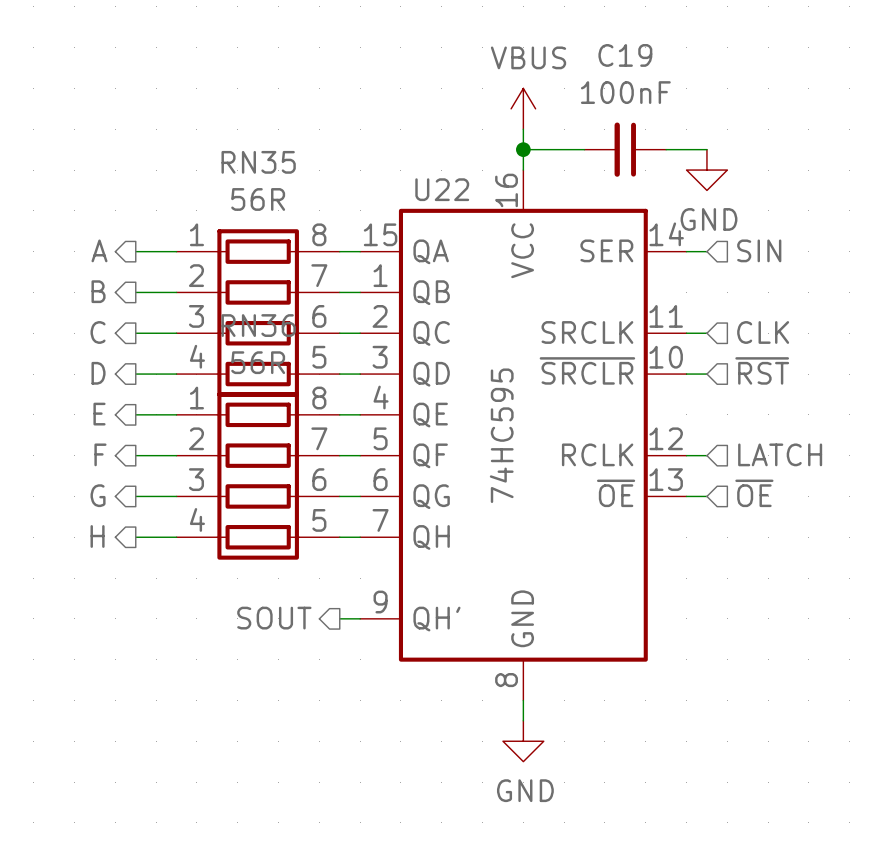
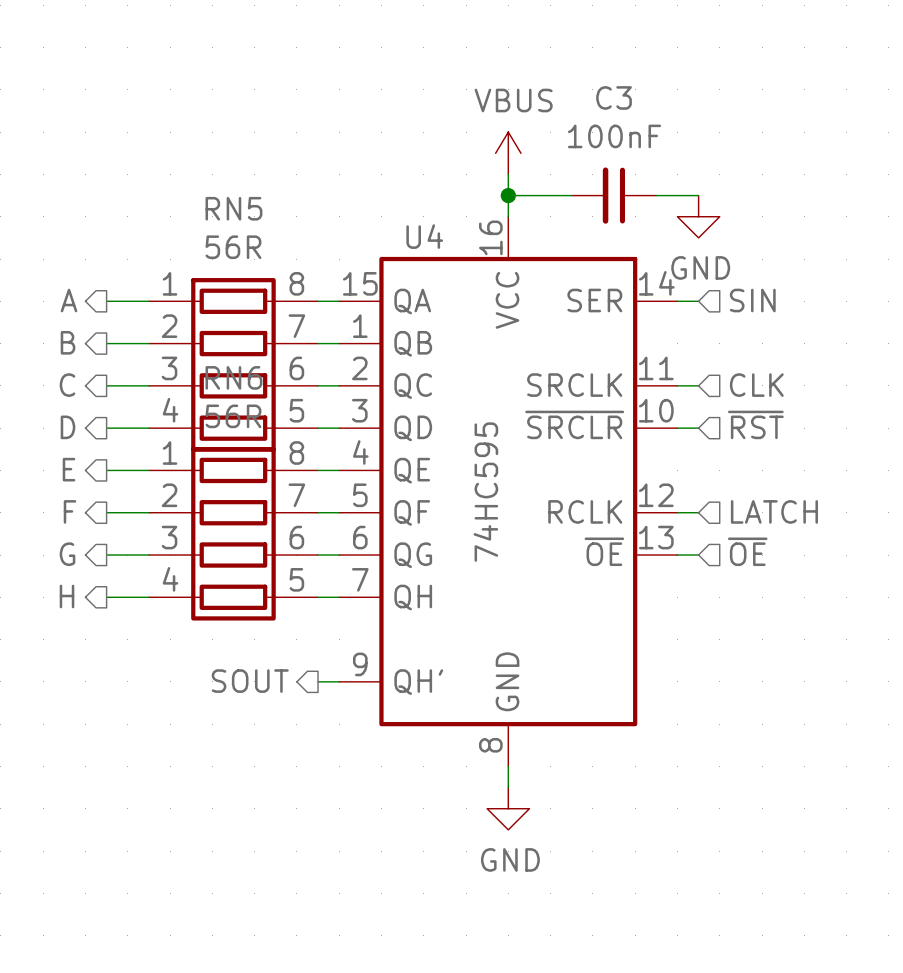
C19 name: C19 (625, 55) -> C3 (614, 97)
RN35 name: RN35 (258, 162) -> RN5 (233, 208)
U22 name: U22 (442, 189) -> U4 (424, 236)
RN36 name: RN36 (258, 325) -> RN6 (233, 377)

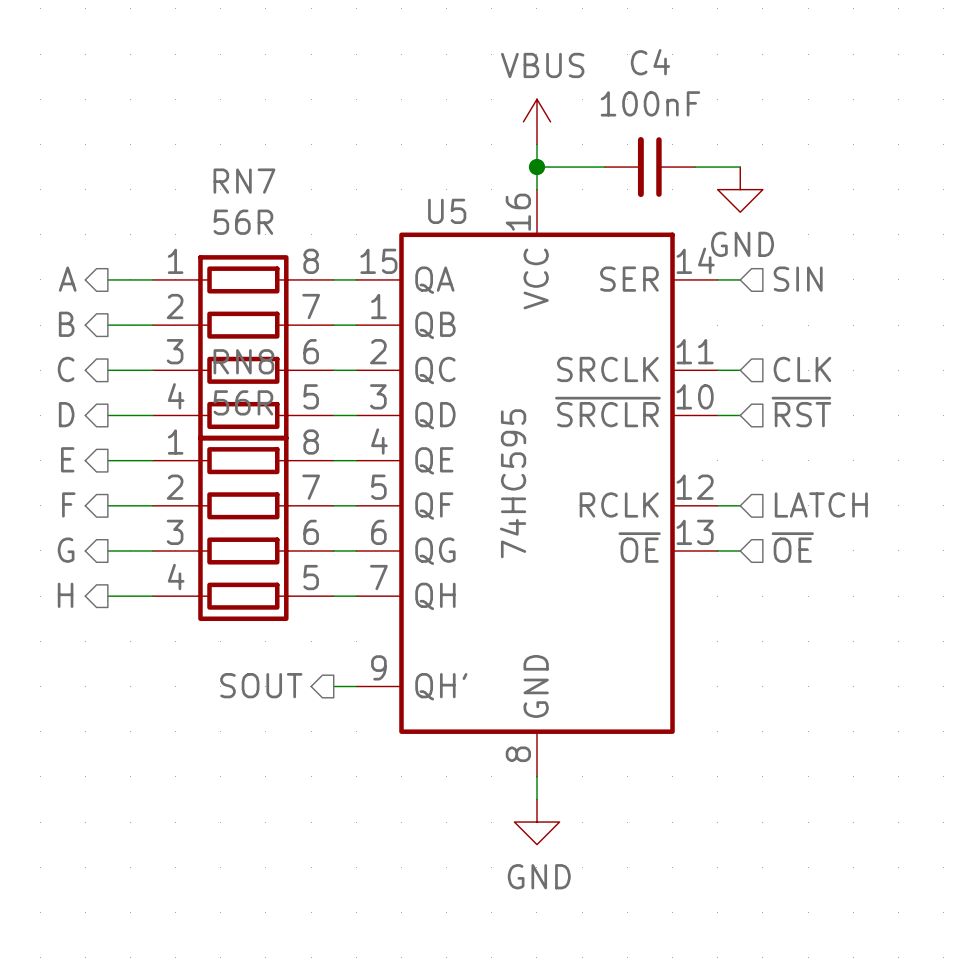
C3 name: C3 (614, 97) -> C4 (650, 62)
RN5 name: RN5 (233, 208) -> RN7 (244, 181)
U4 name: U4 (424, 236) -> U5 (447, 211)
RN6 name: RN6 (233, 377) -> RN8 (243, 361)

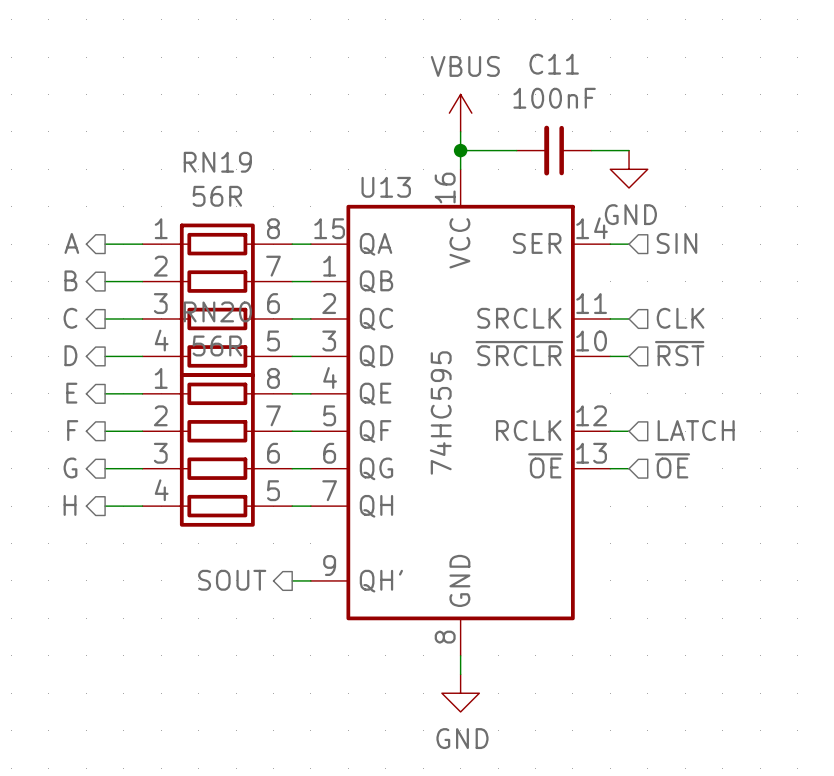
C4 name: C4 (650, 62) -> C11 (554, 64)
RN7 name: RN7 (244, 181) -> RN19 (217, 162)
U5 name: U5 (447, 211) -> U13 (386, 187)
RN8 name: RN8 (243, 361) -> RN20 (217, 311)

